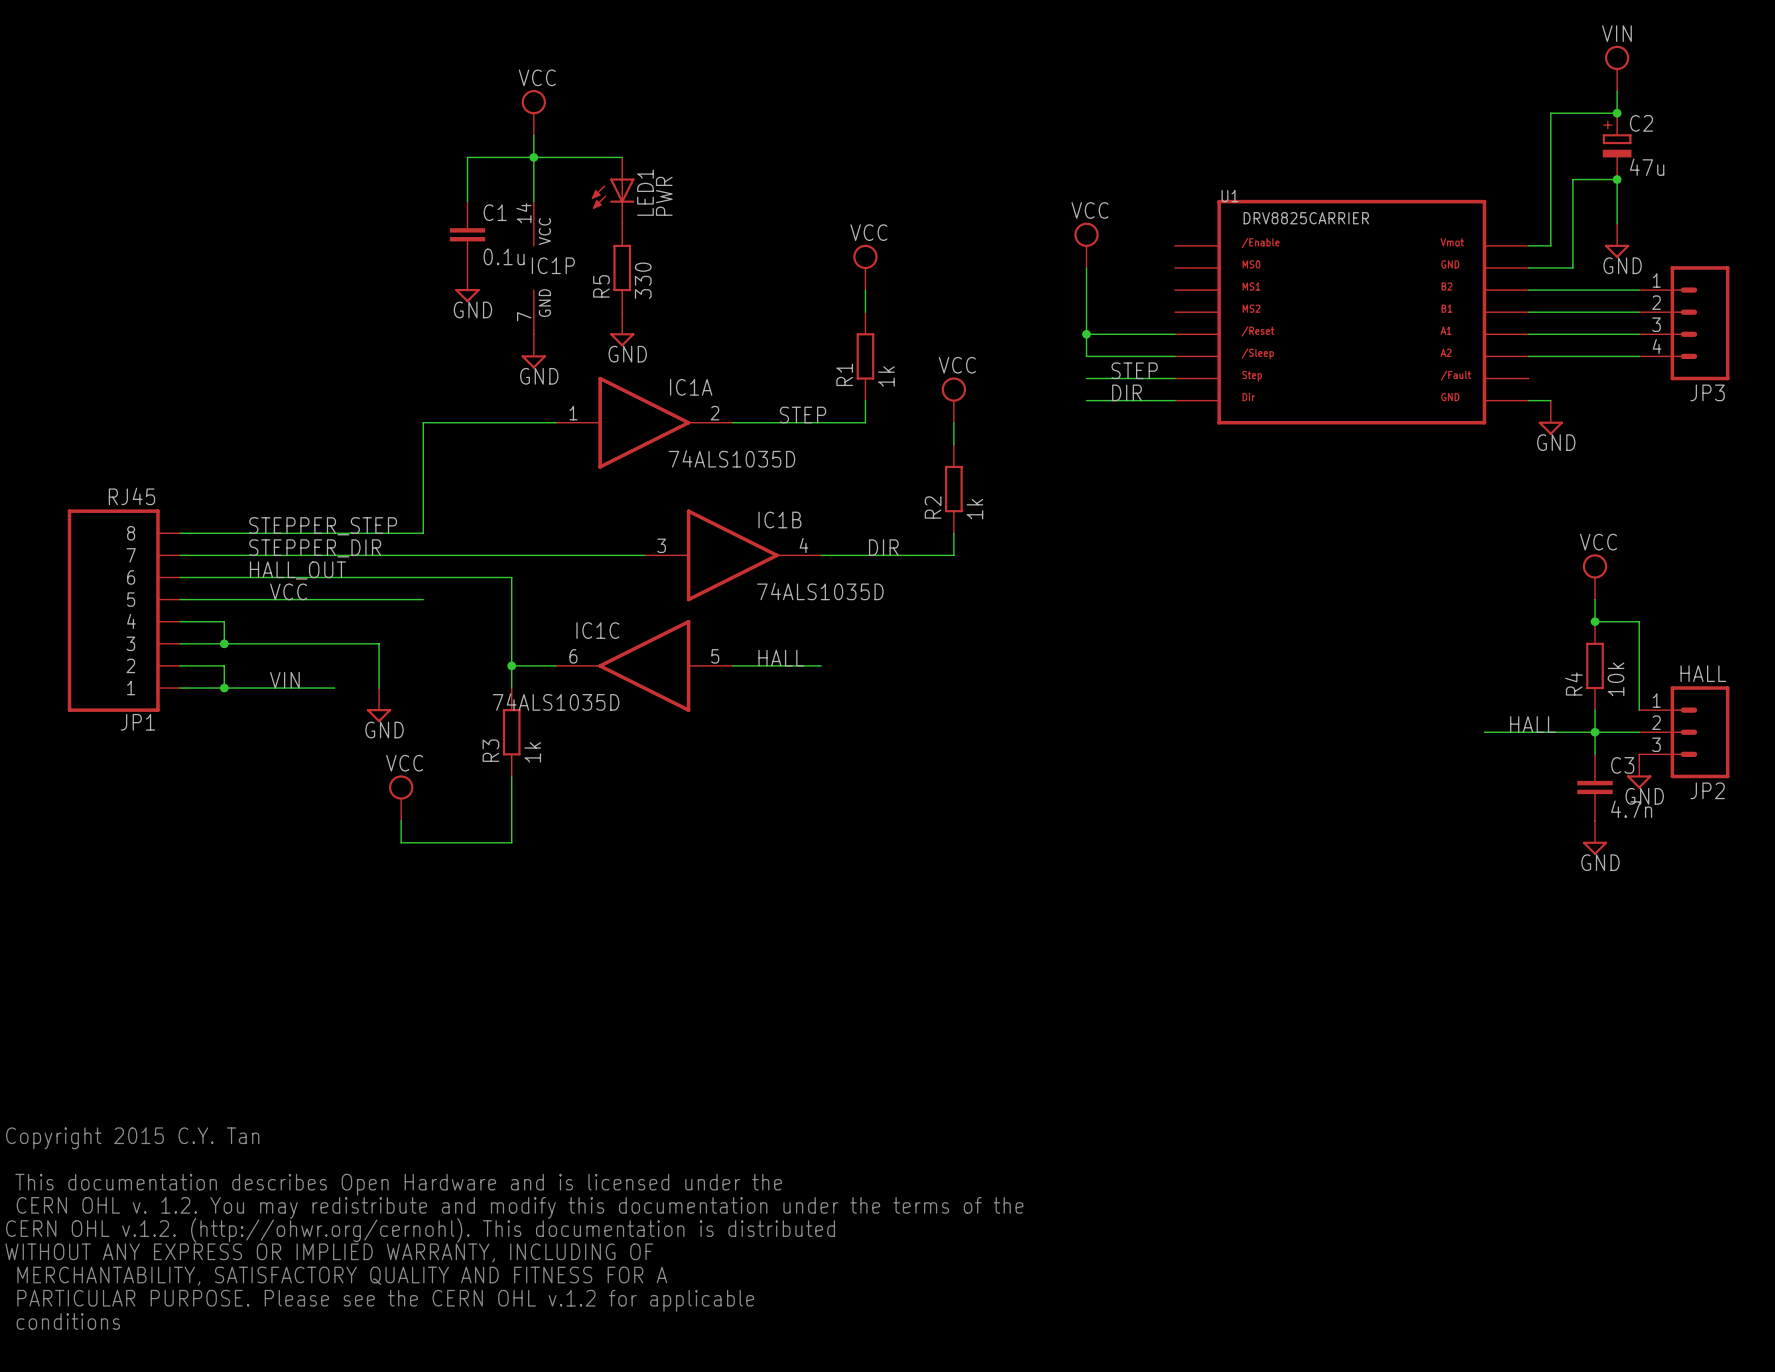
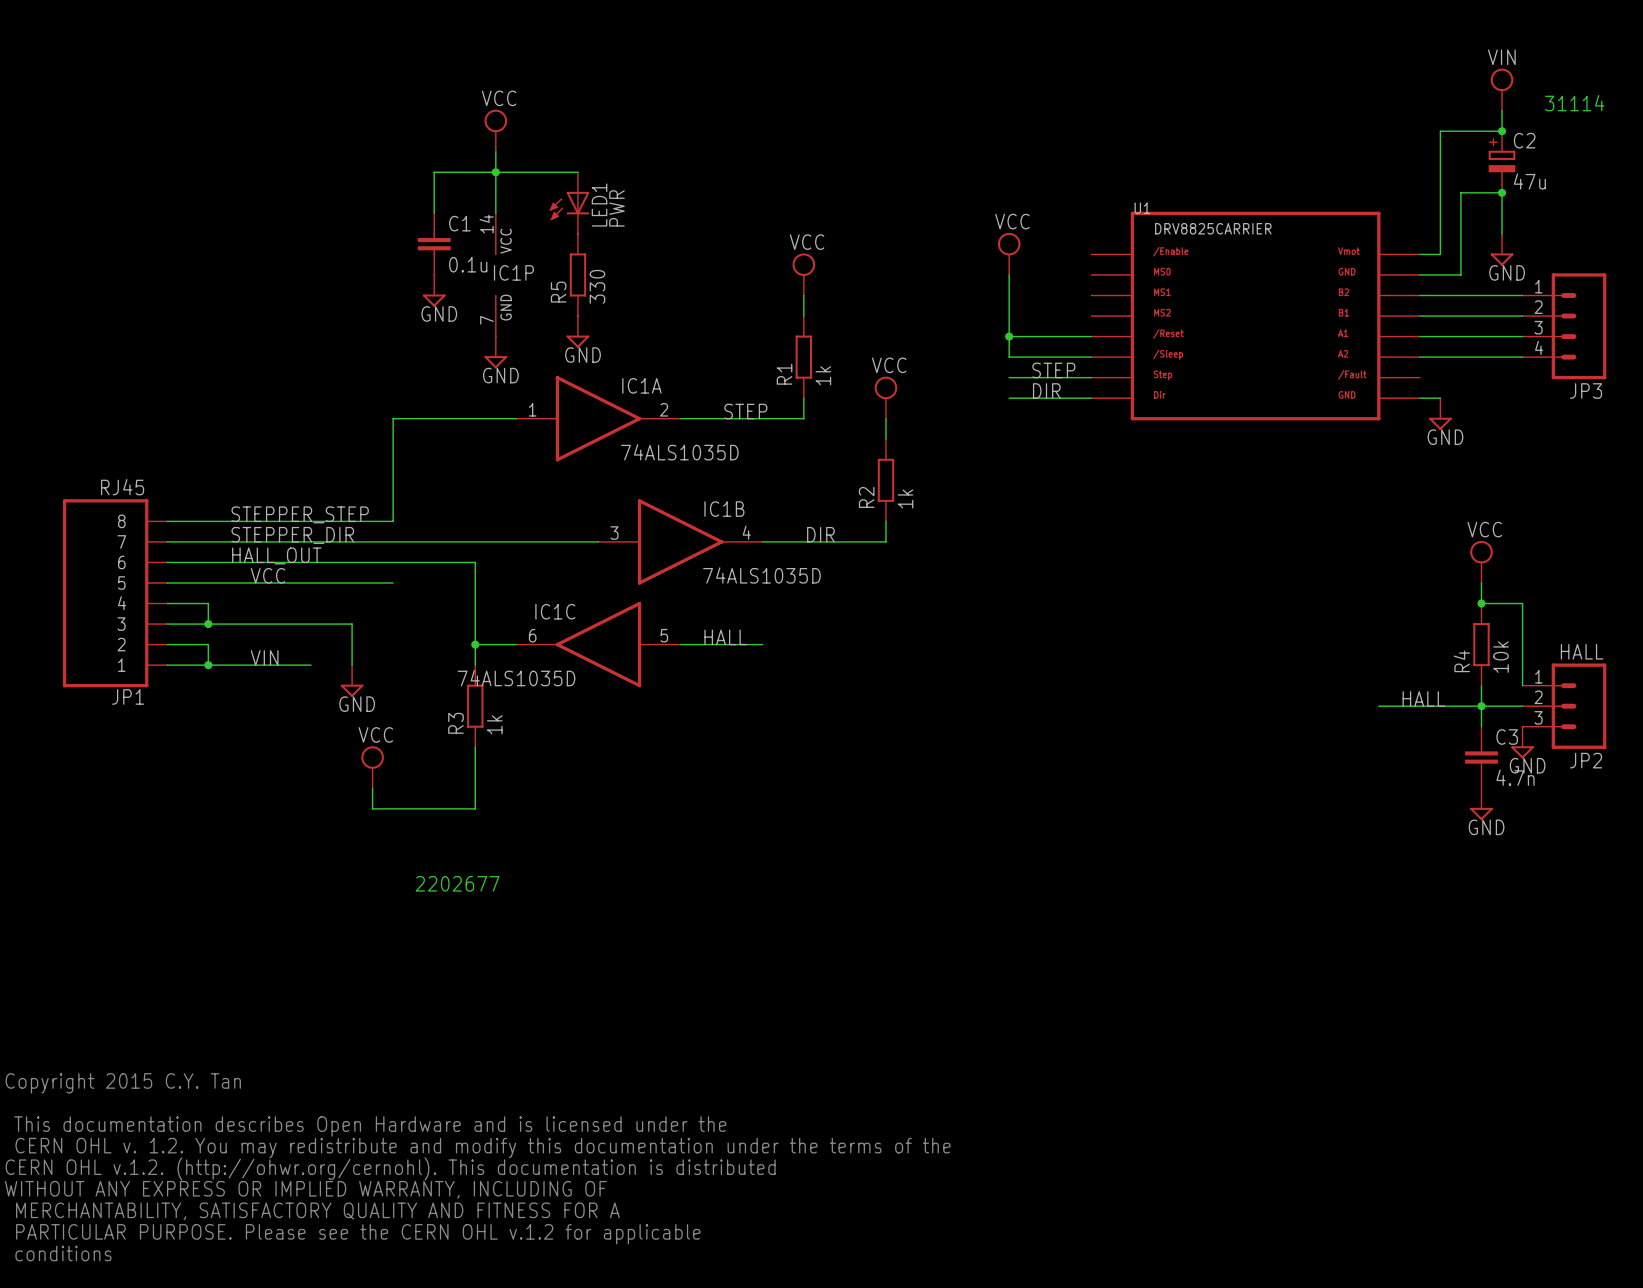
text: none -> 31114 (1574, 103)
text: none -> 2202677 (457, 883)

